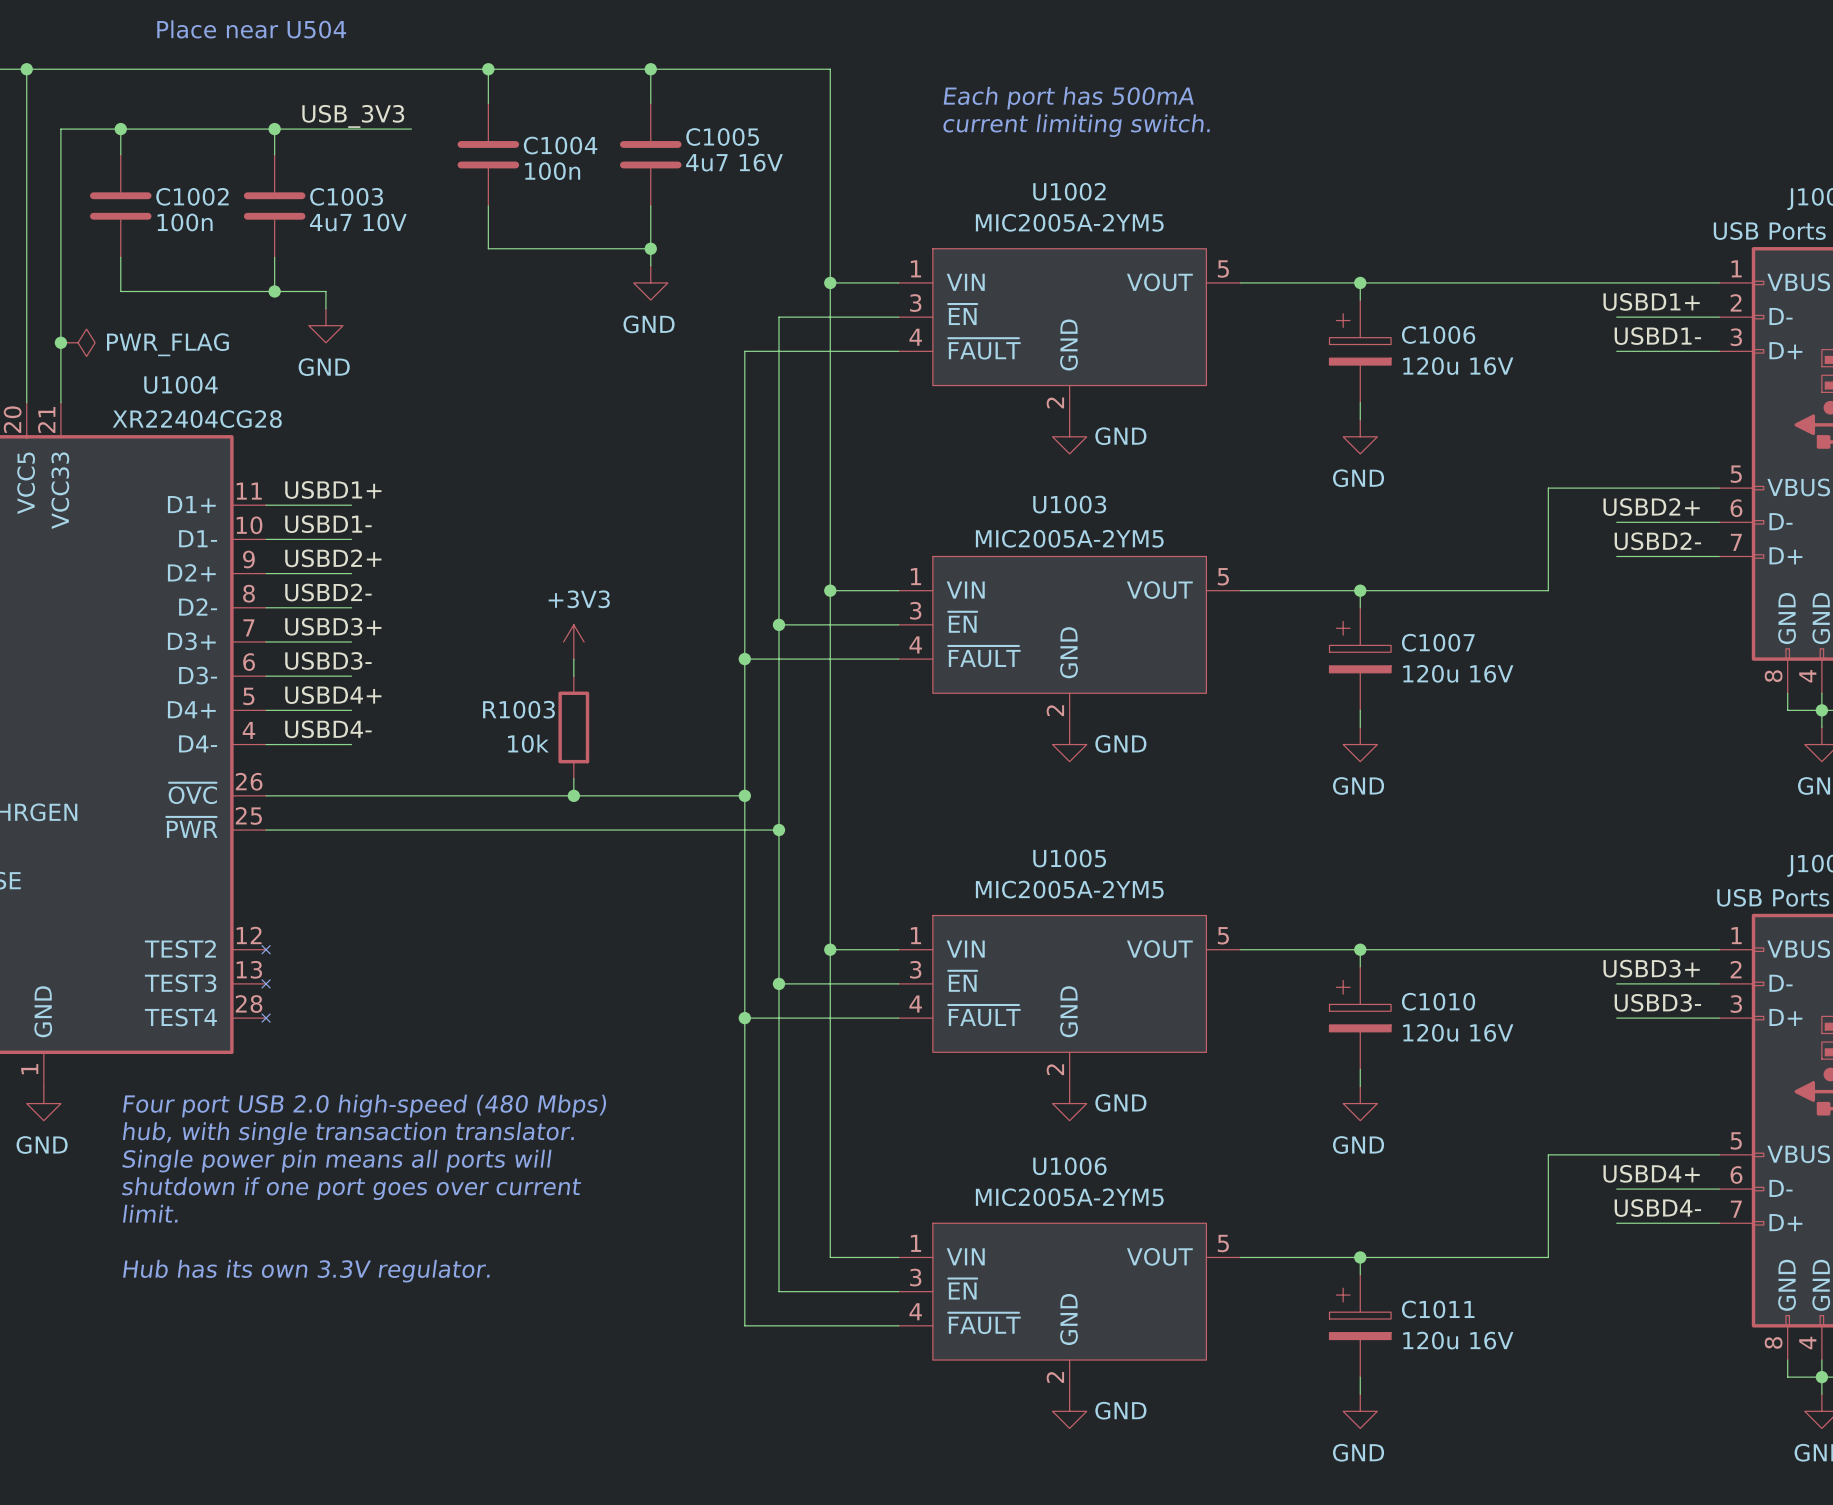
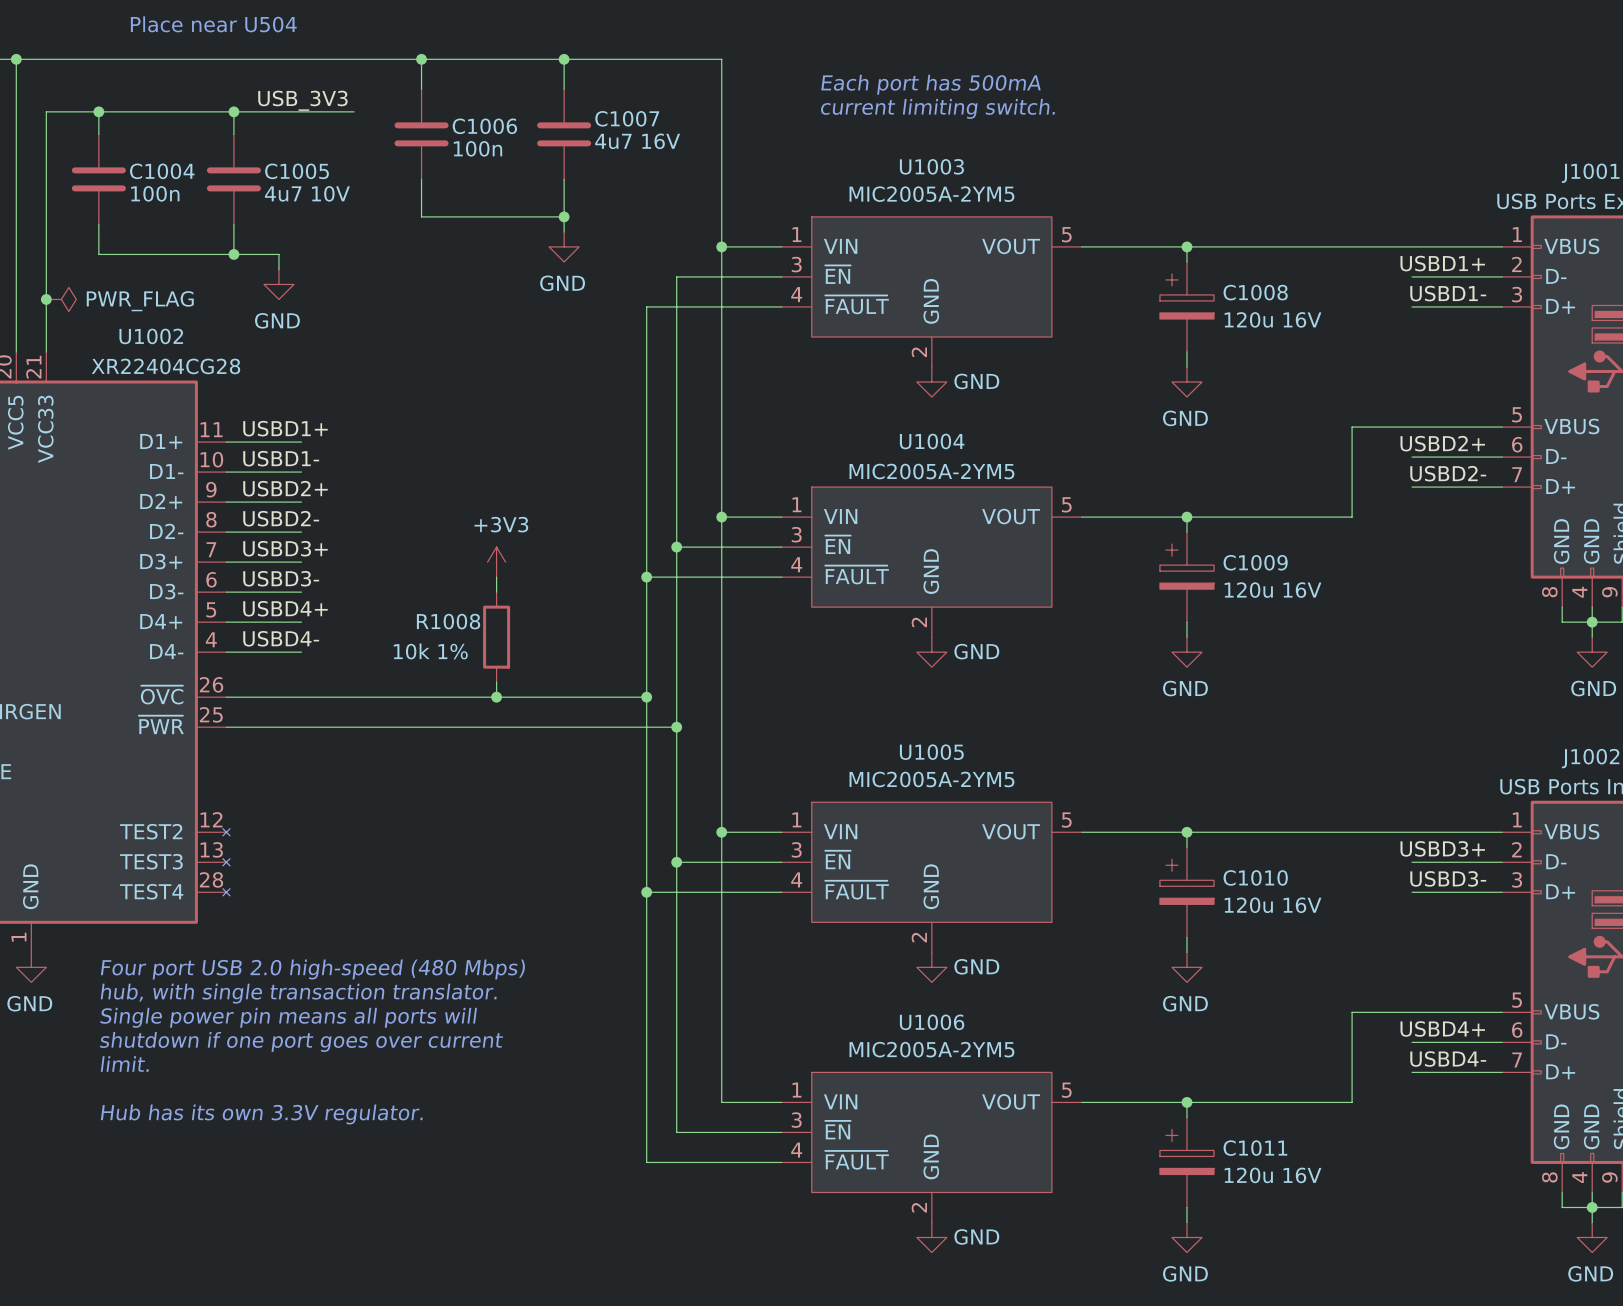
C1005 name: C1005 (722, 137) -> C1007 (627, 118)
C1004 name: C1004 (560, 145) -> C1006 (484, 126)
U1002 name: U1002 (1069, 191) -> U1003 (931, 166)
C1002 name: C1002 (192, 196) -> C1004 (162, 171)
C1003 name: C1003 (346, 196) -> C1005 (297, 171)
C1006 name: C1006 (1438, 334) -> C1008 (1255, 292)
U1004 name: U1004 (180, 384) -> U1002 (151, 336)
U1003 name: U1003 (1069, 504) -> U1004 (932, 441)
C1007 name: C1007 (1438, 642) -> C1009 (1255, 562)
R1003 name: R1003 (518, 709) -> R1008 (448, 621)
R1003 value: 10k (528, 743) -> 10k 1% (430, 651)

